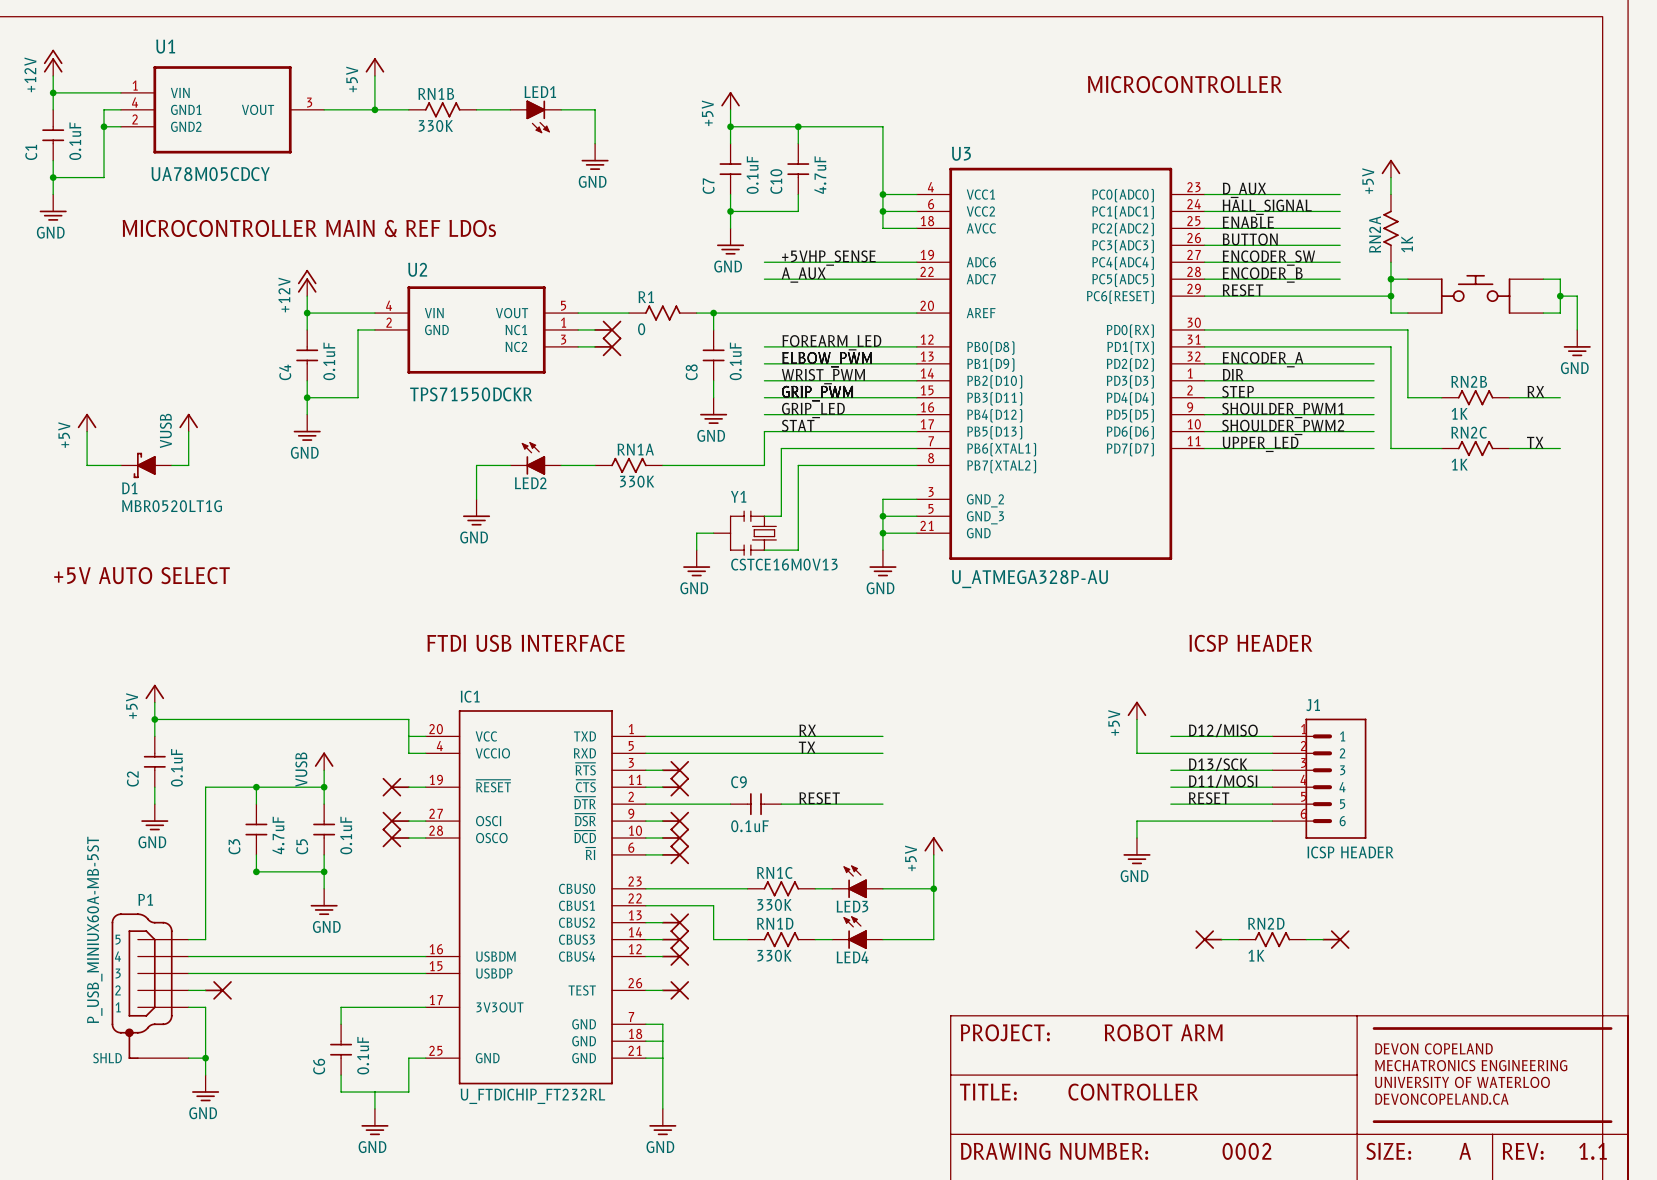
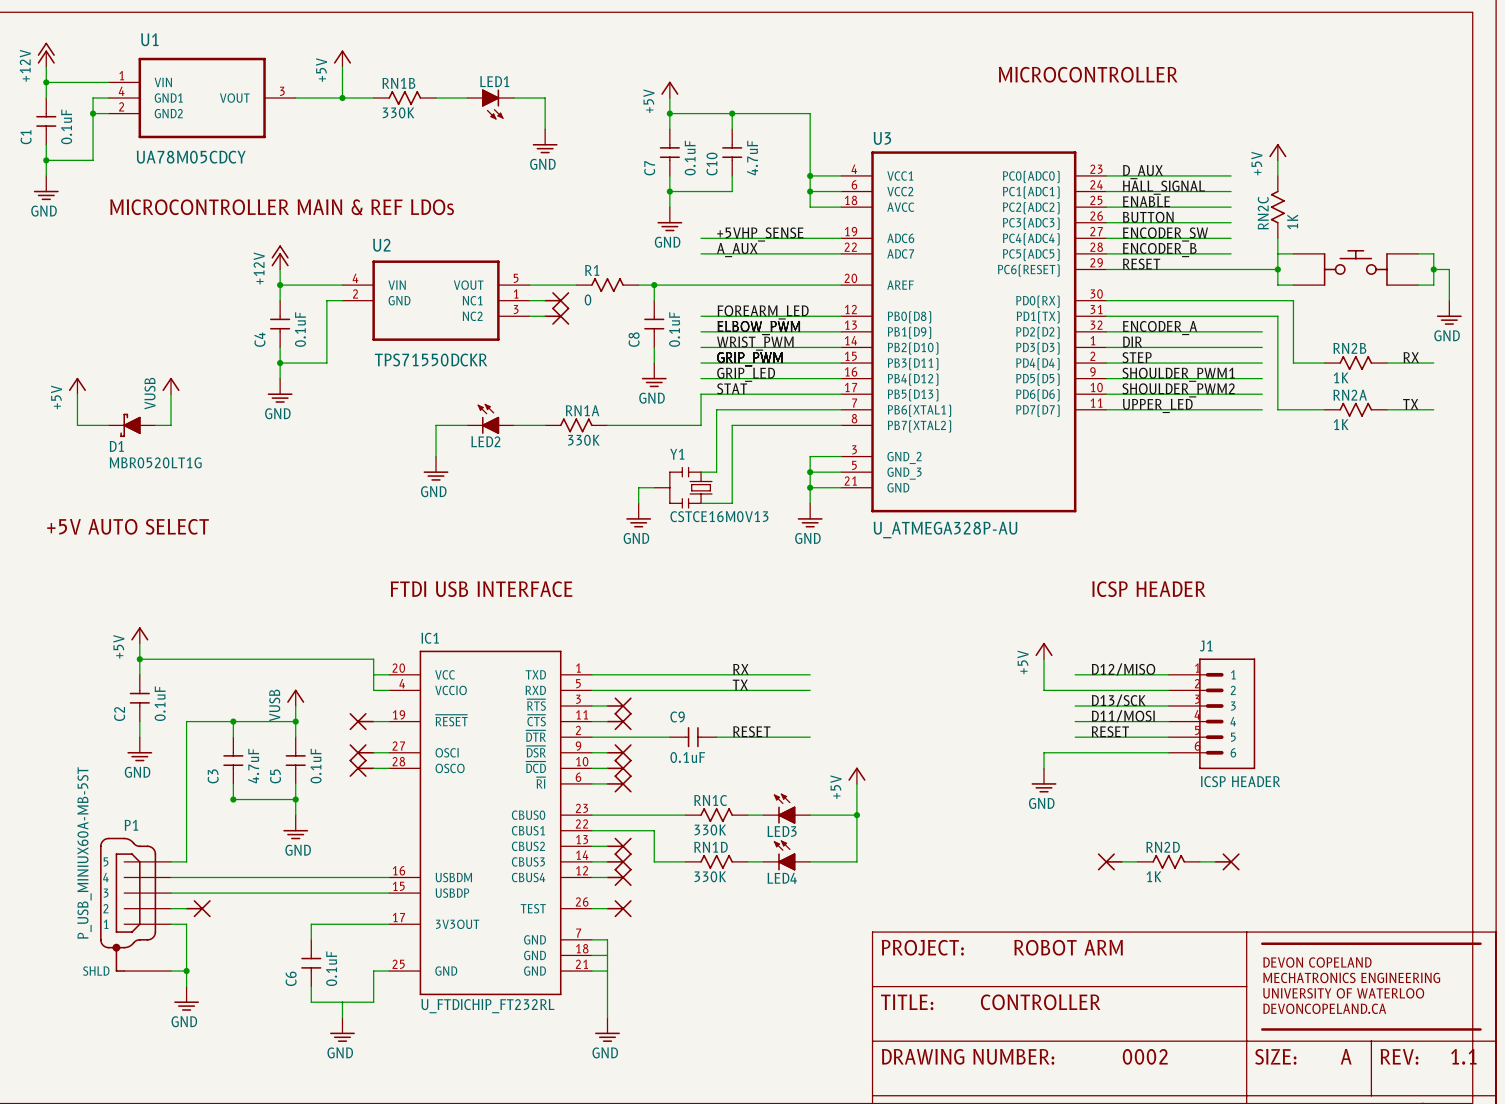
RN2A name: RN2A (1375, 234) -> RN2C (1263, 213)
junction: (1390, 279) -> none
RN2C name: RN2C (1469, 432) -> RN2A (1350, 395)

